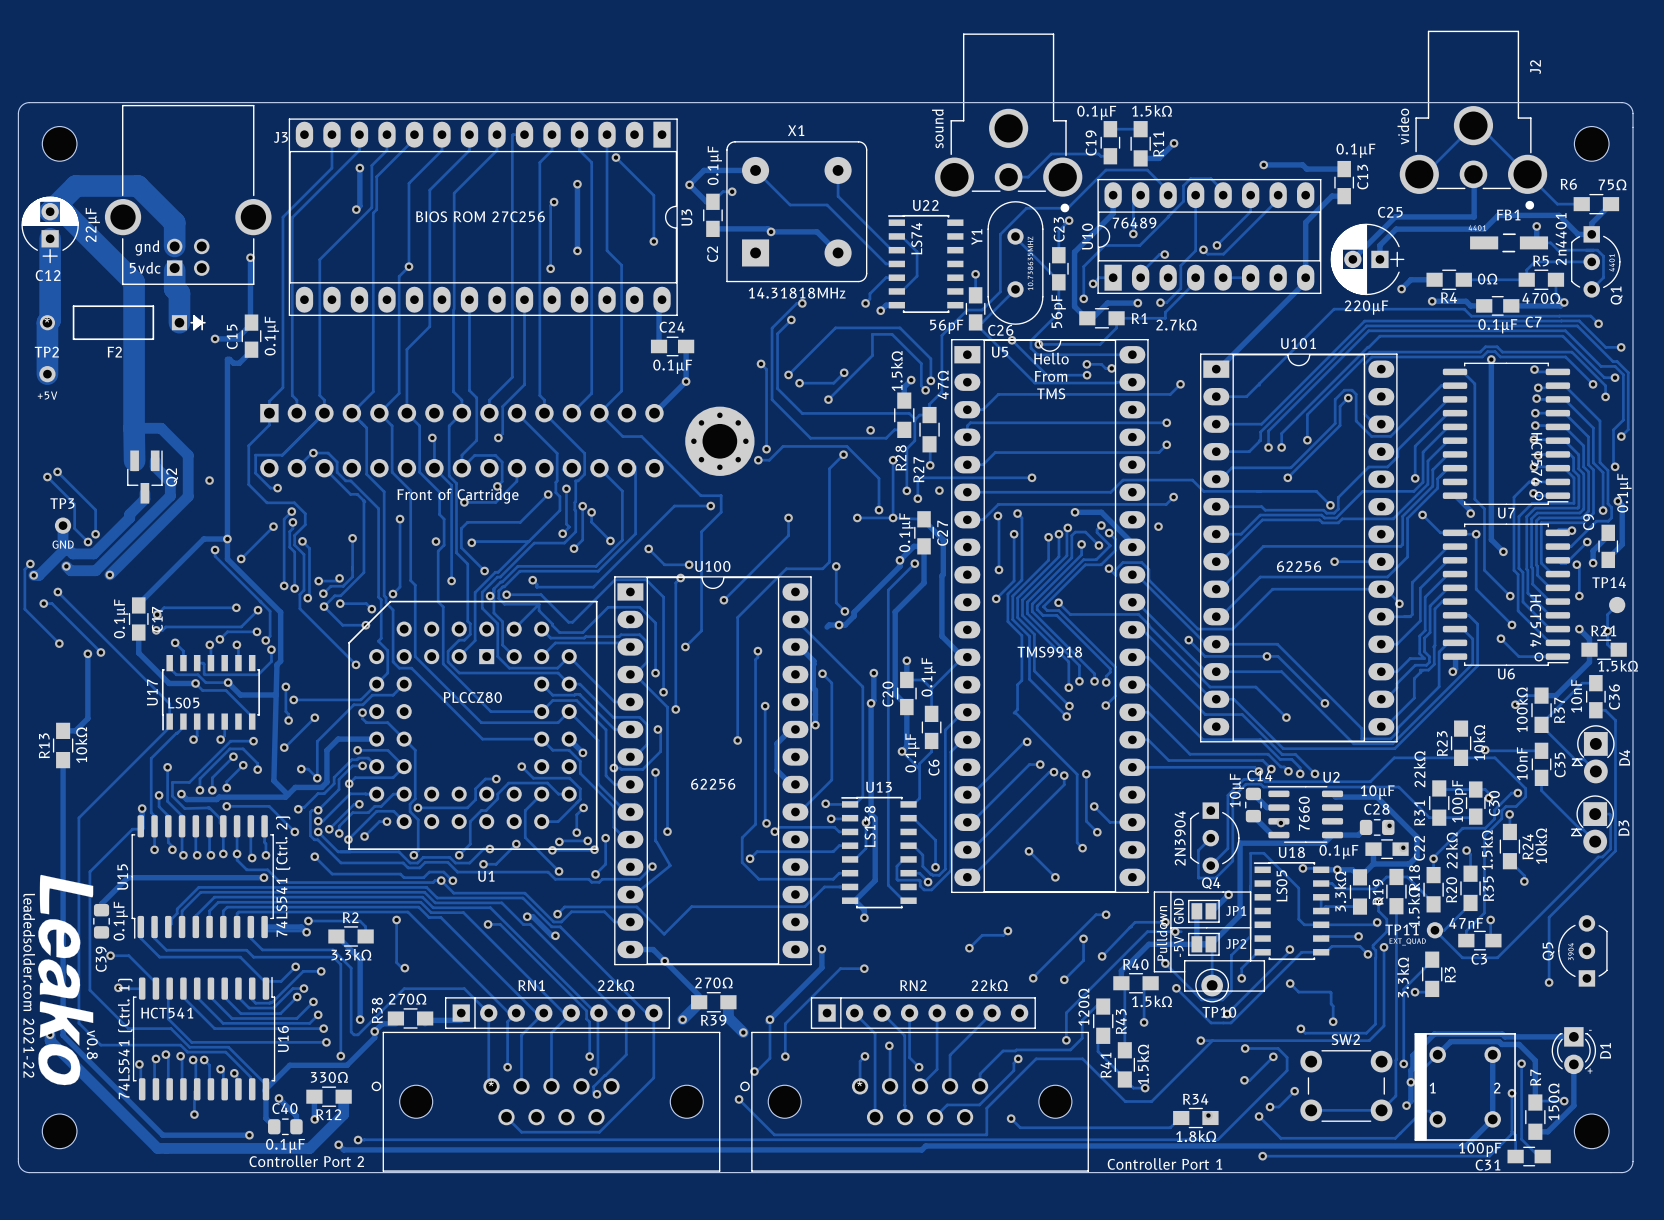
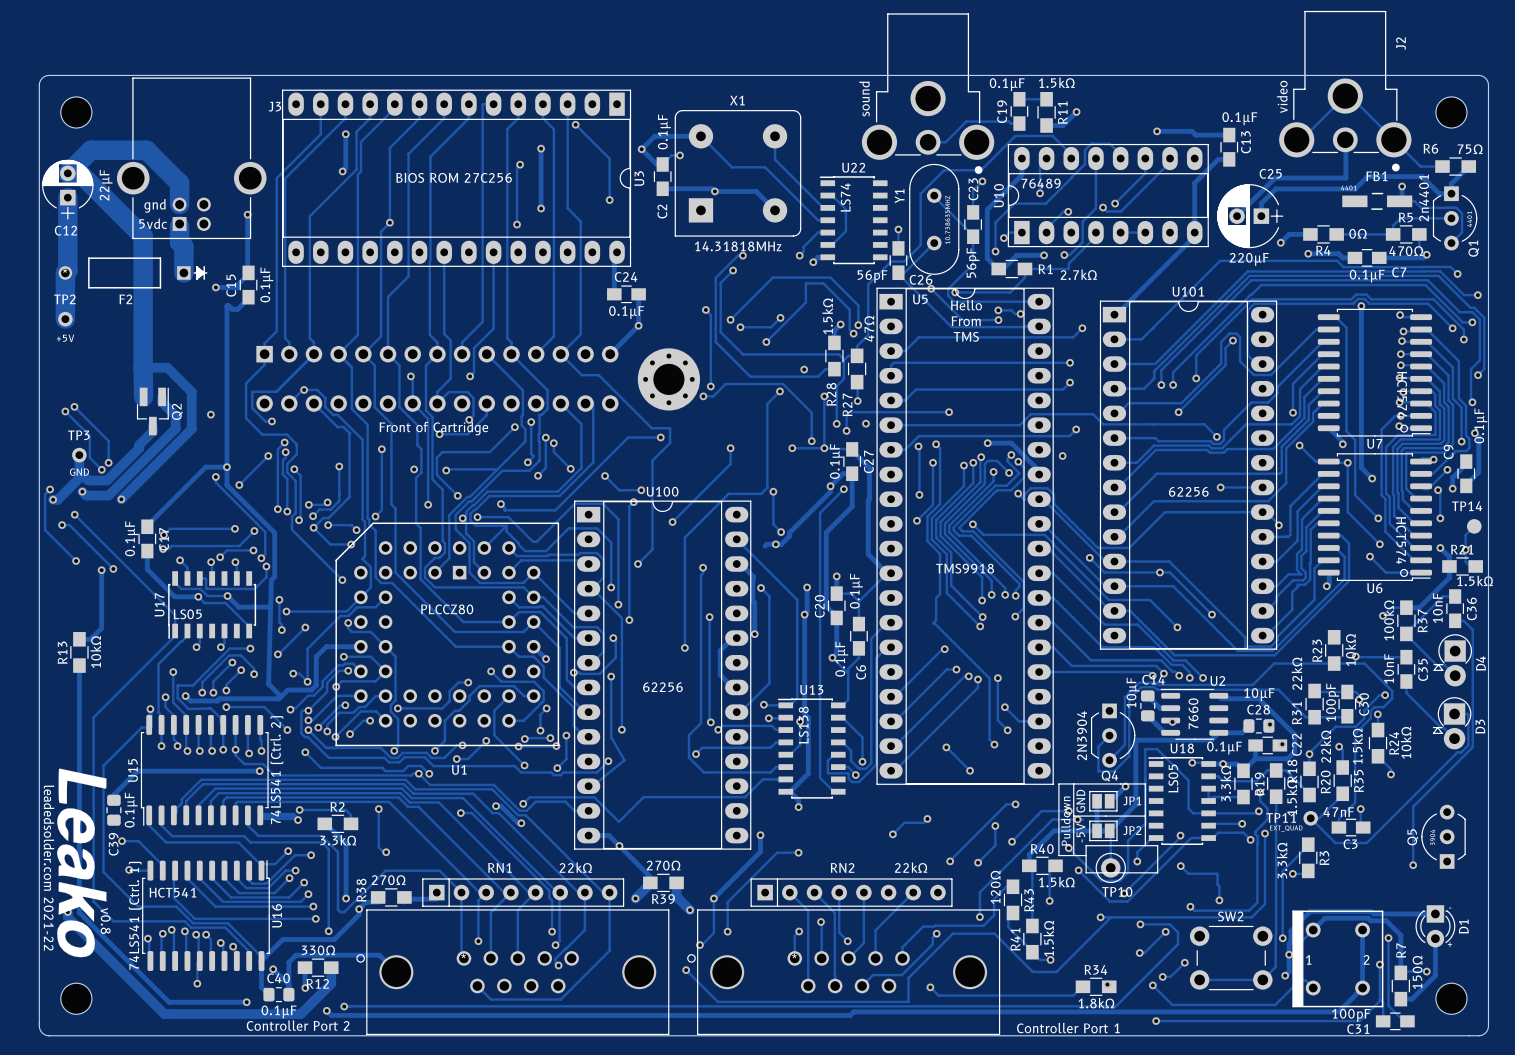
part footprint: [371, 1031, 721, 1172] -> [356, 909, 670, 1035]
part footprint: [740, 1031, 1089, 1172] -> [687, 909, 1001, 1035]
track: none -> (396, 972) (379, 955) (296, 955) (288, 962) (288, 984)

